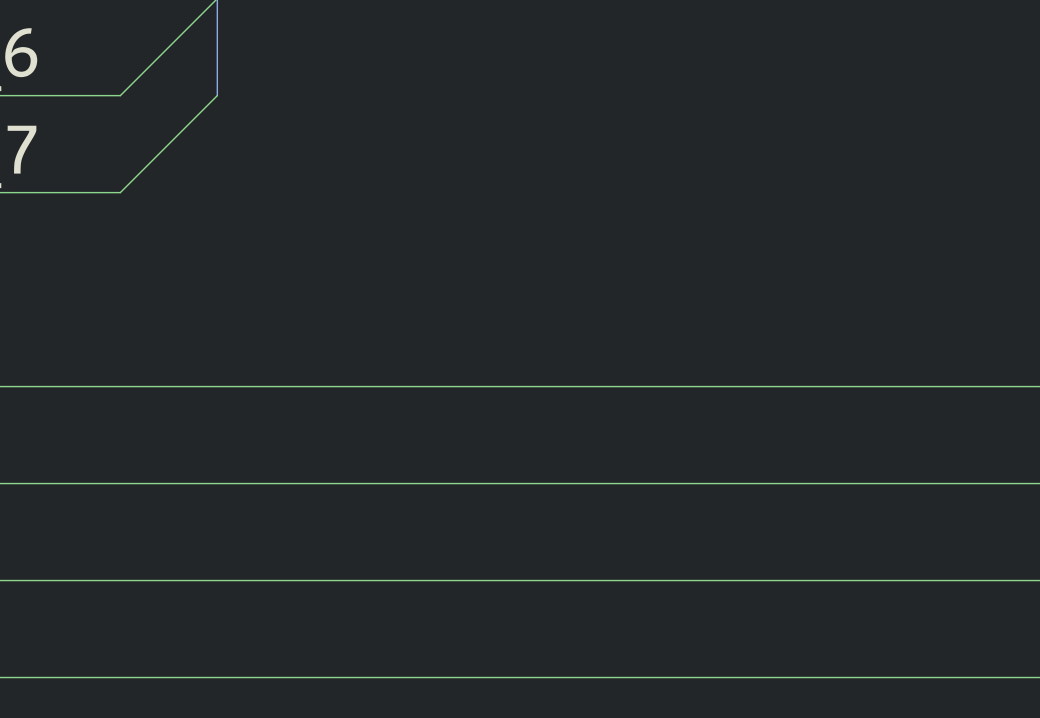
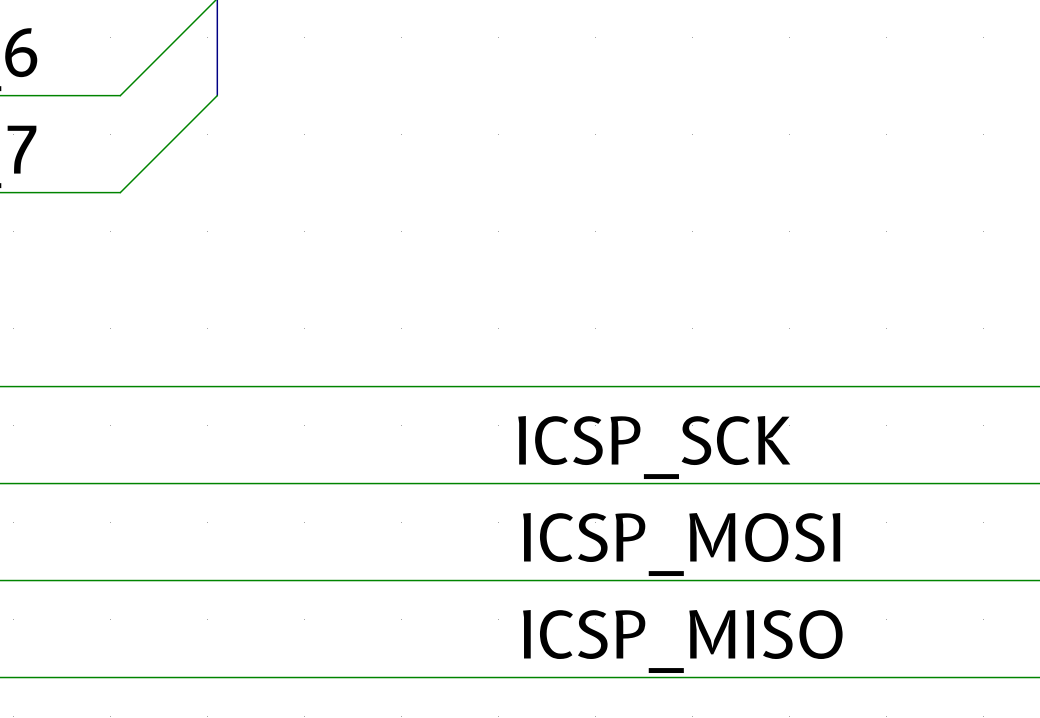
label: none -> ICSP_SCK (654, 447)
label: none -> ICSP_MOSI (681, 544)
label: none -> ICSP_MISO (682, 641)

